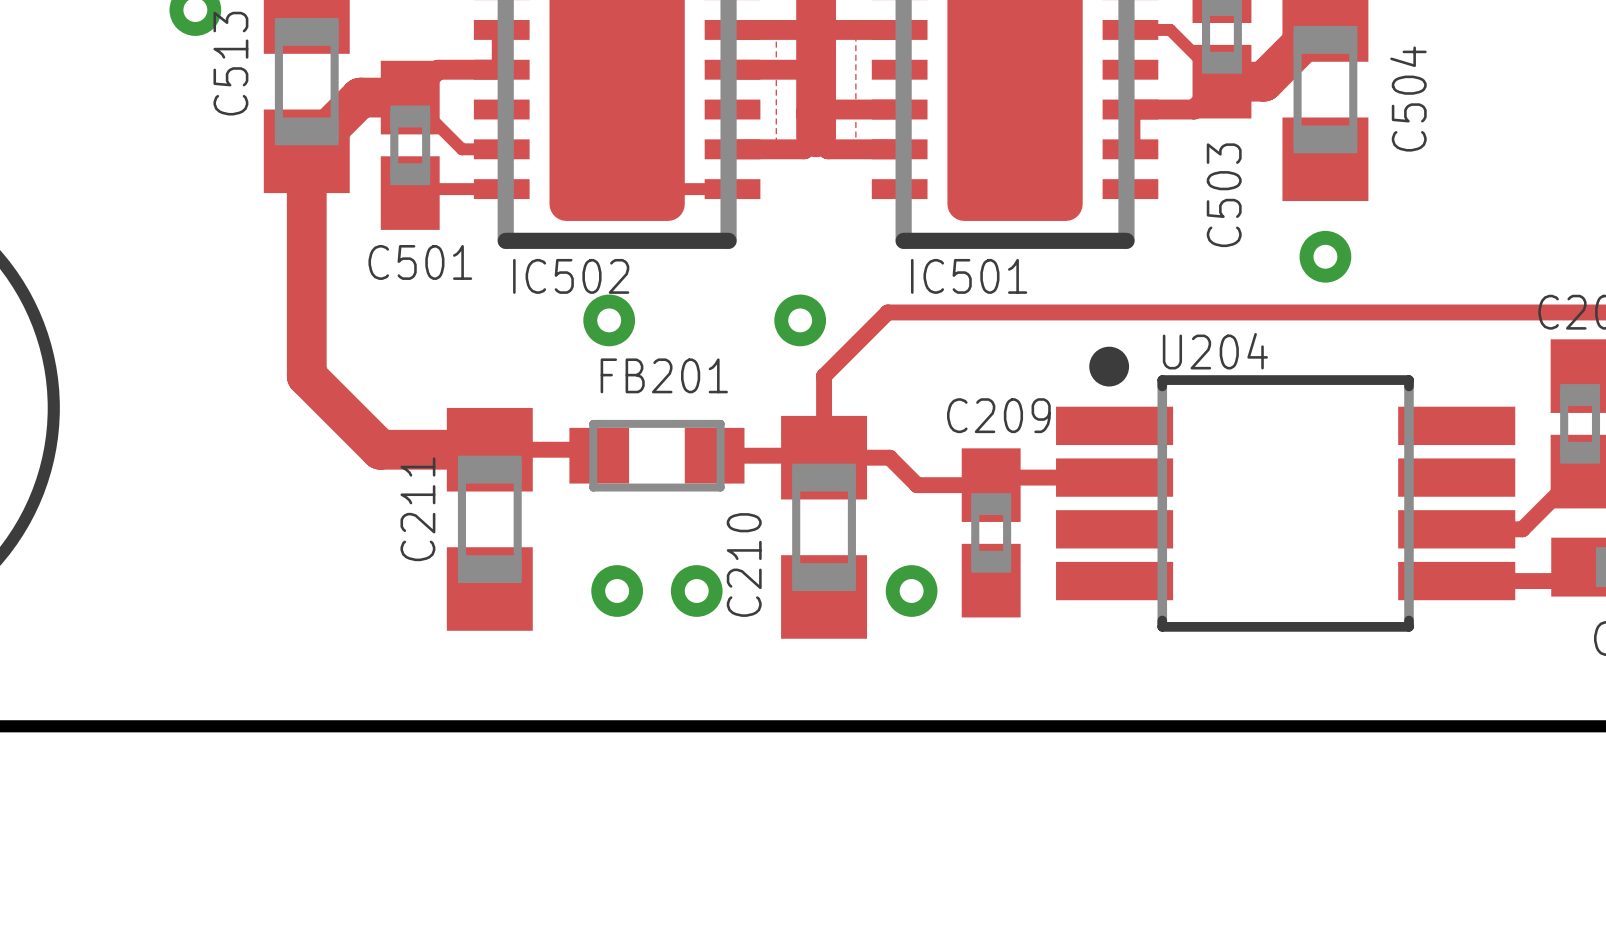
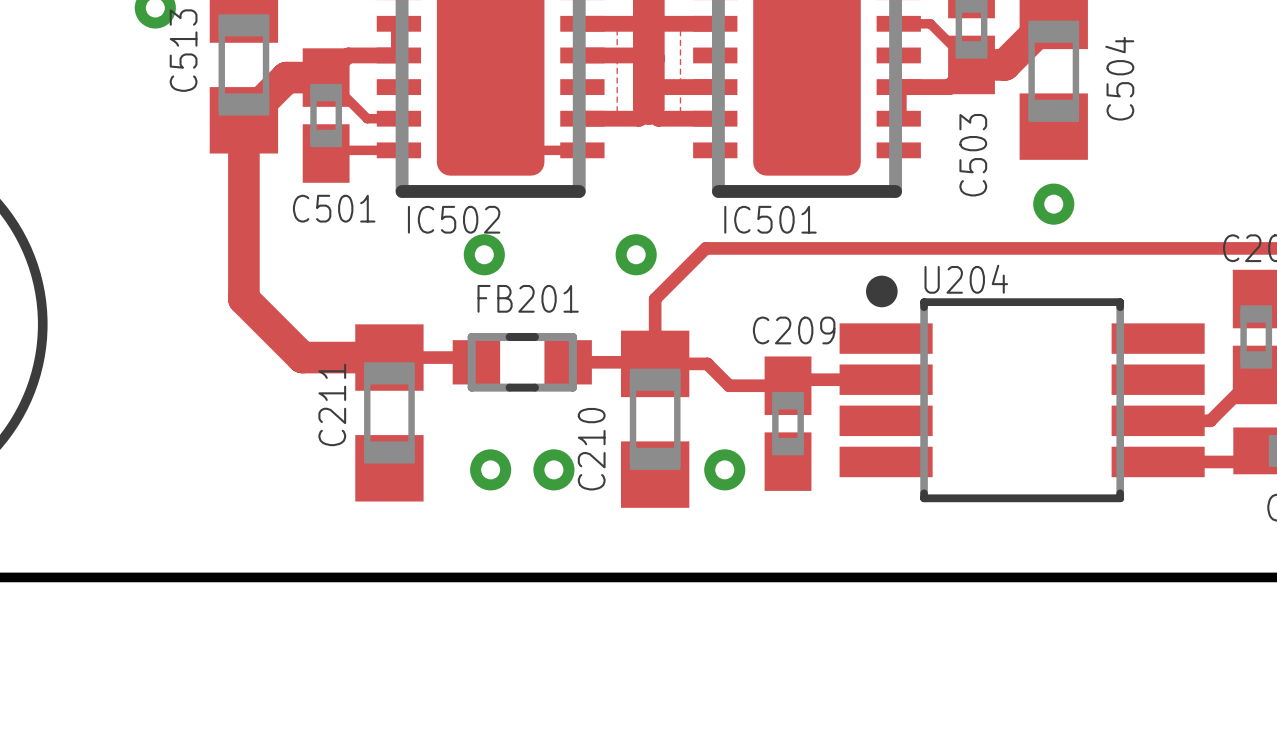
FB201 footprint: [569, 419, 745, 492] -> [452, 332, 592, 392]

